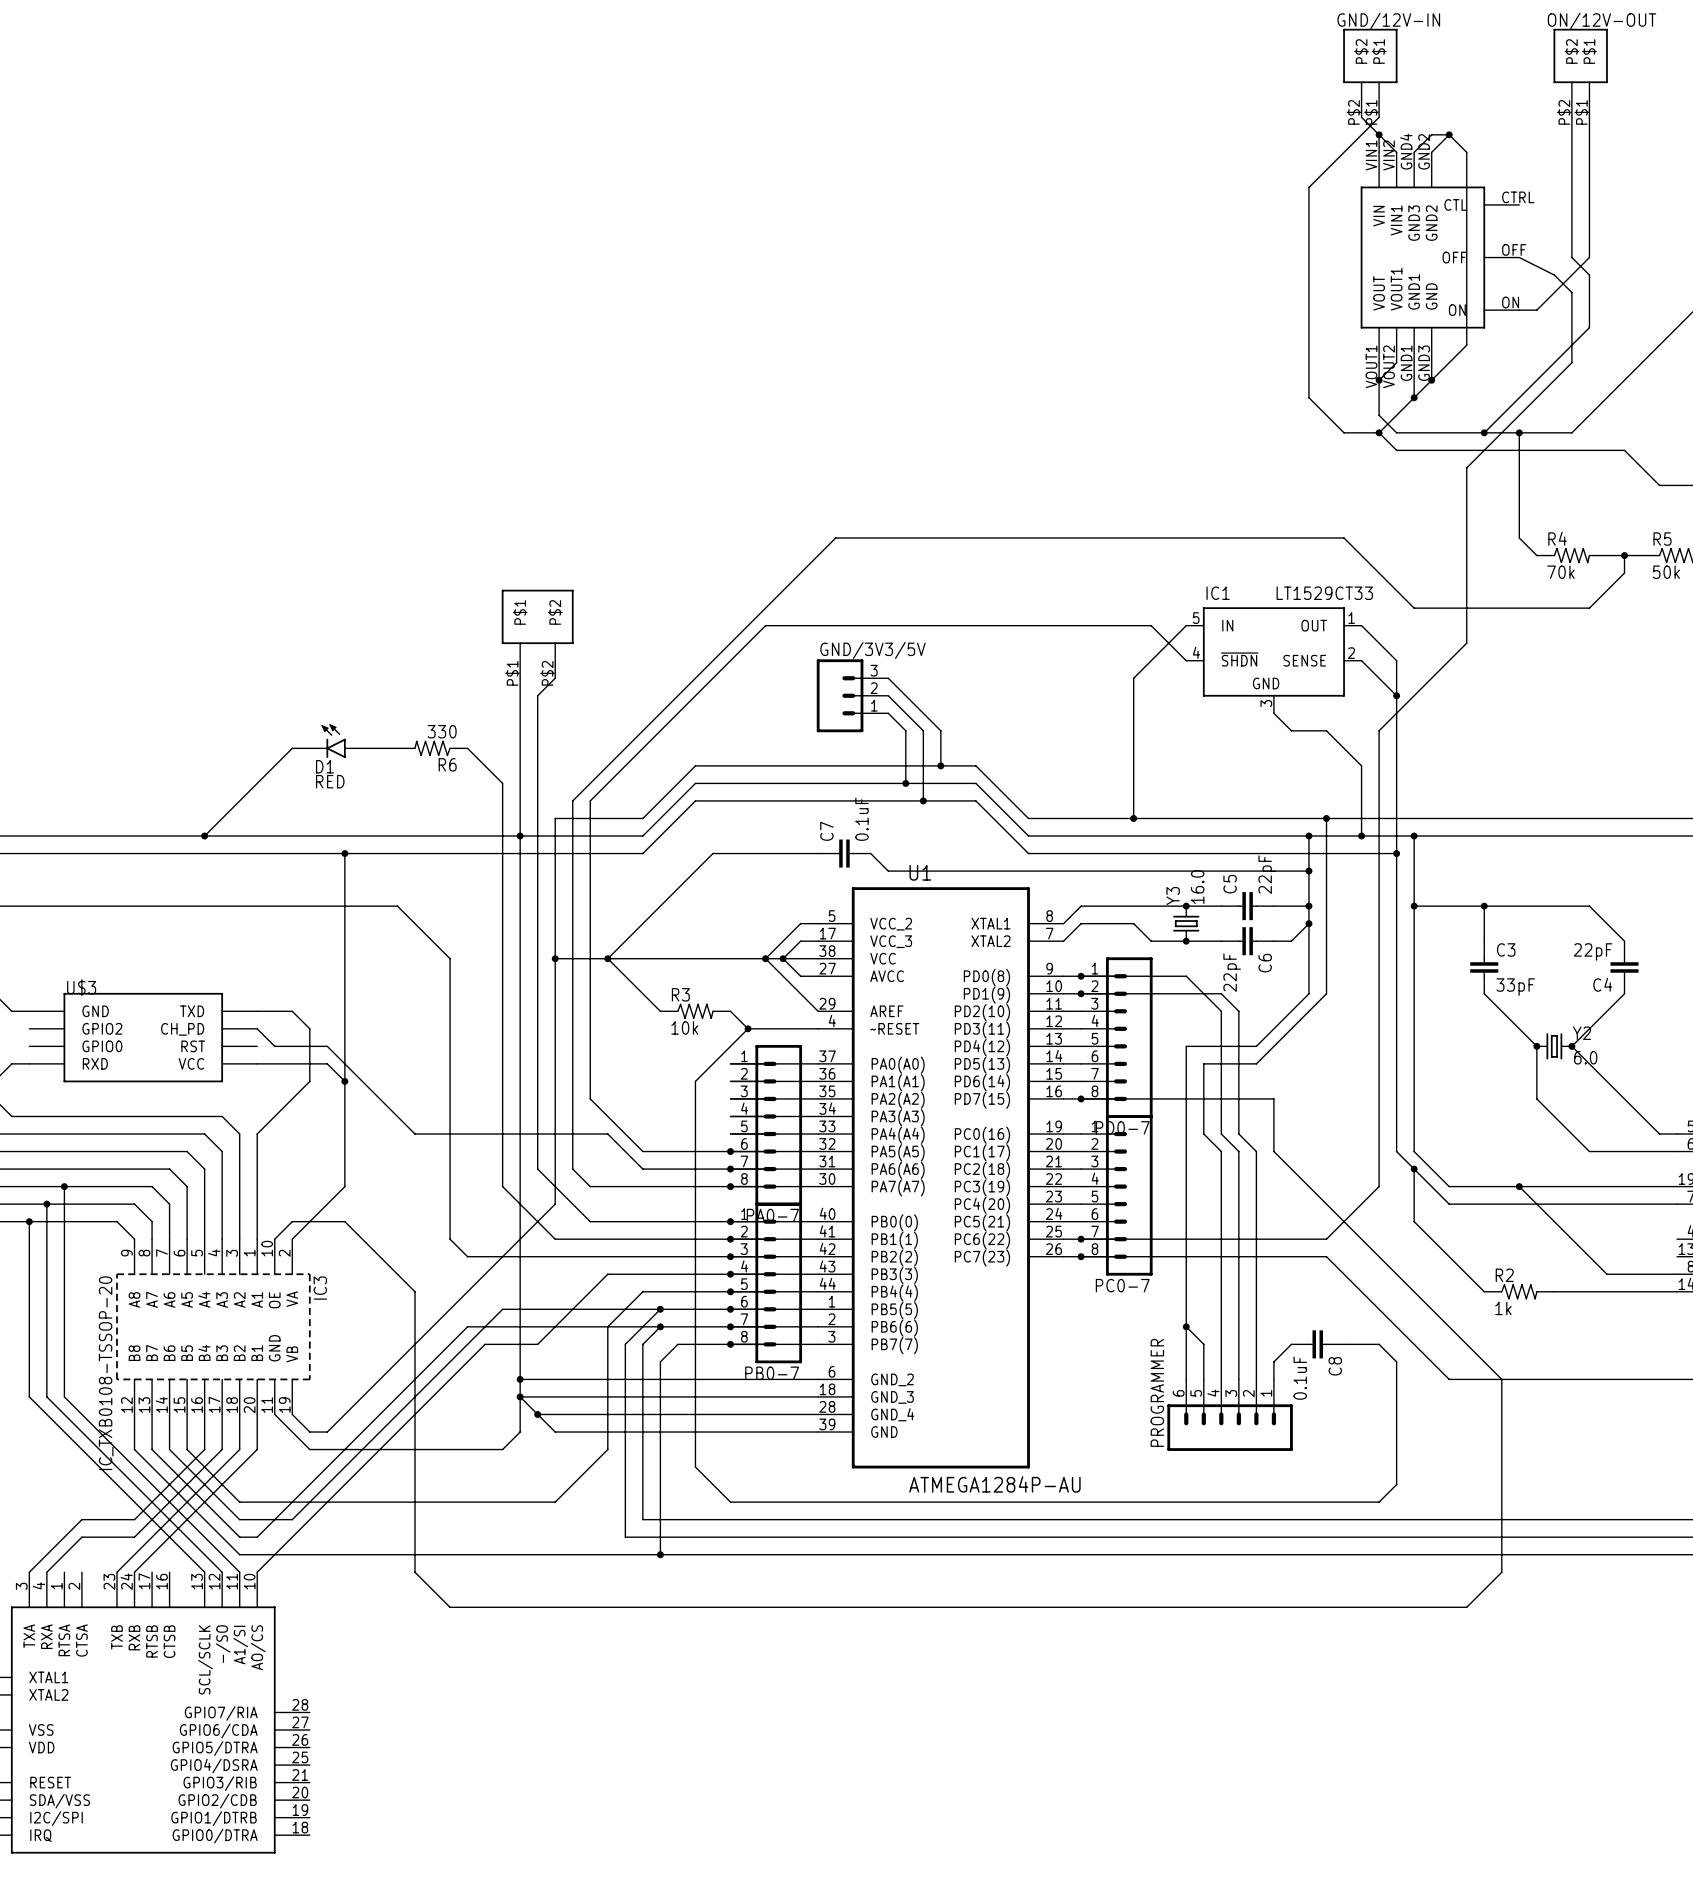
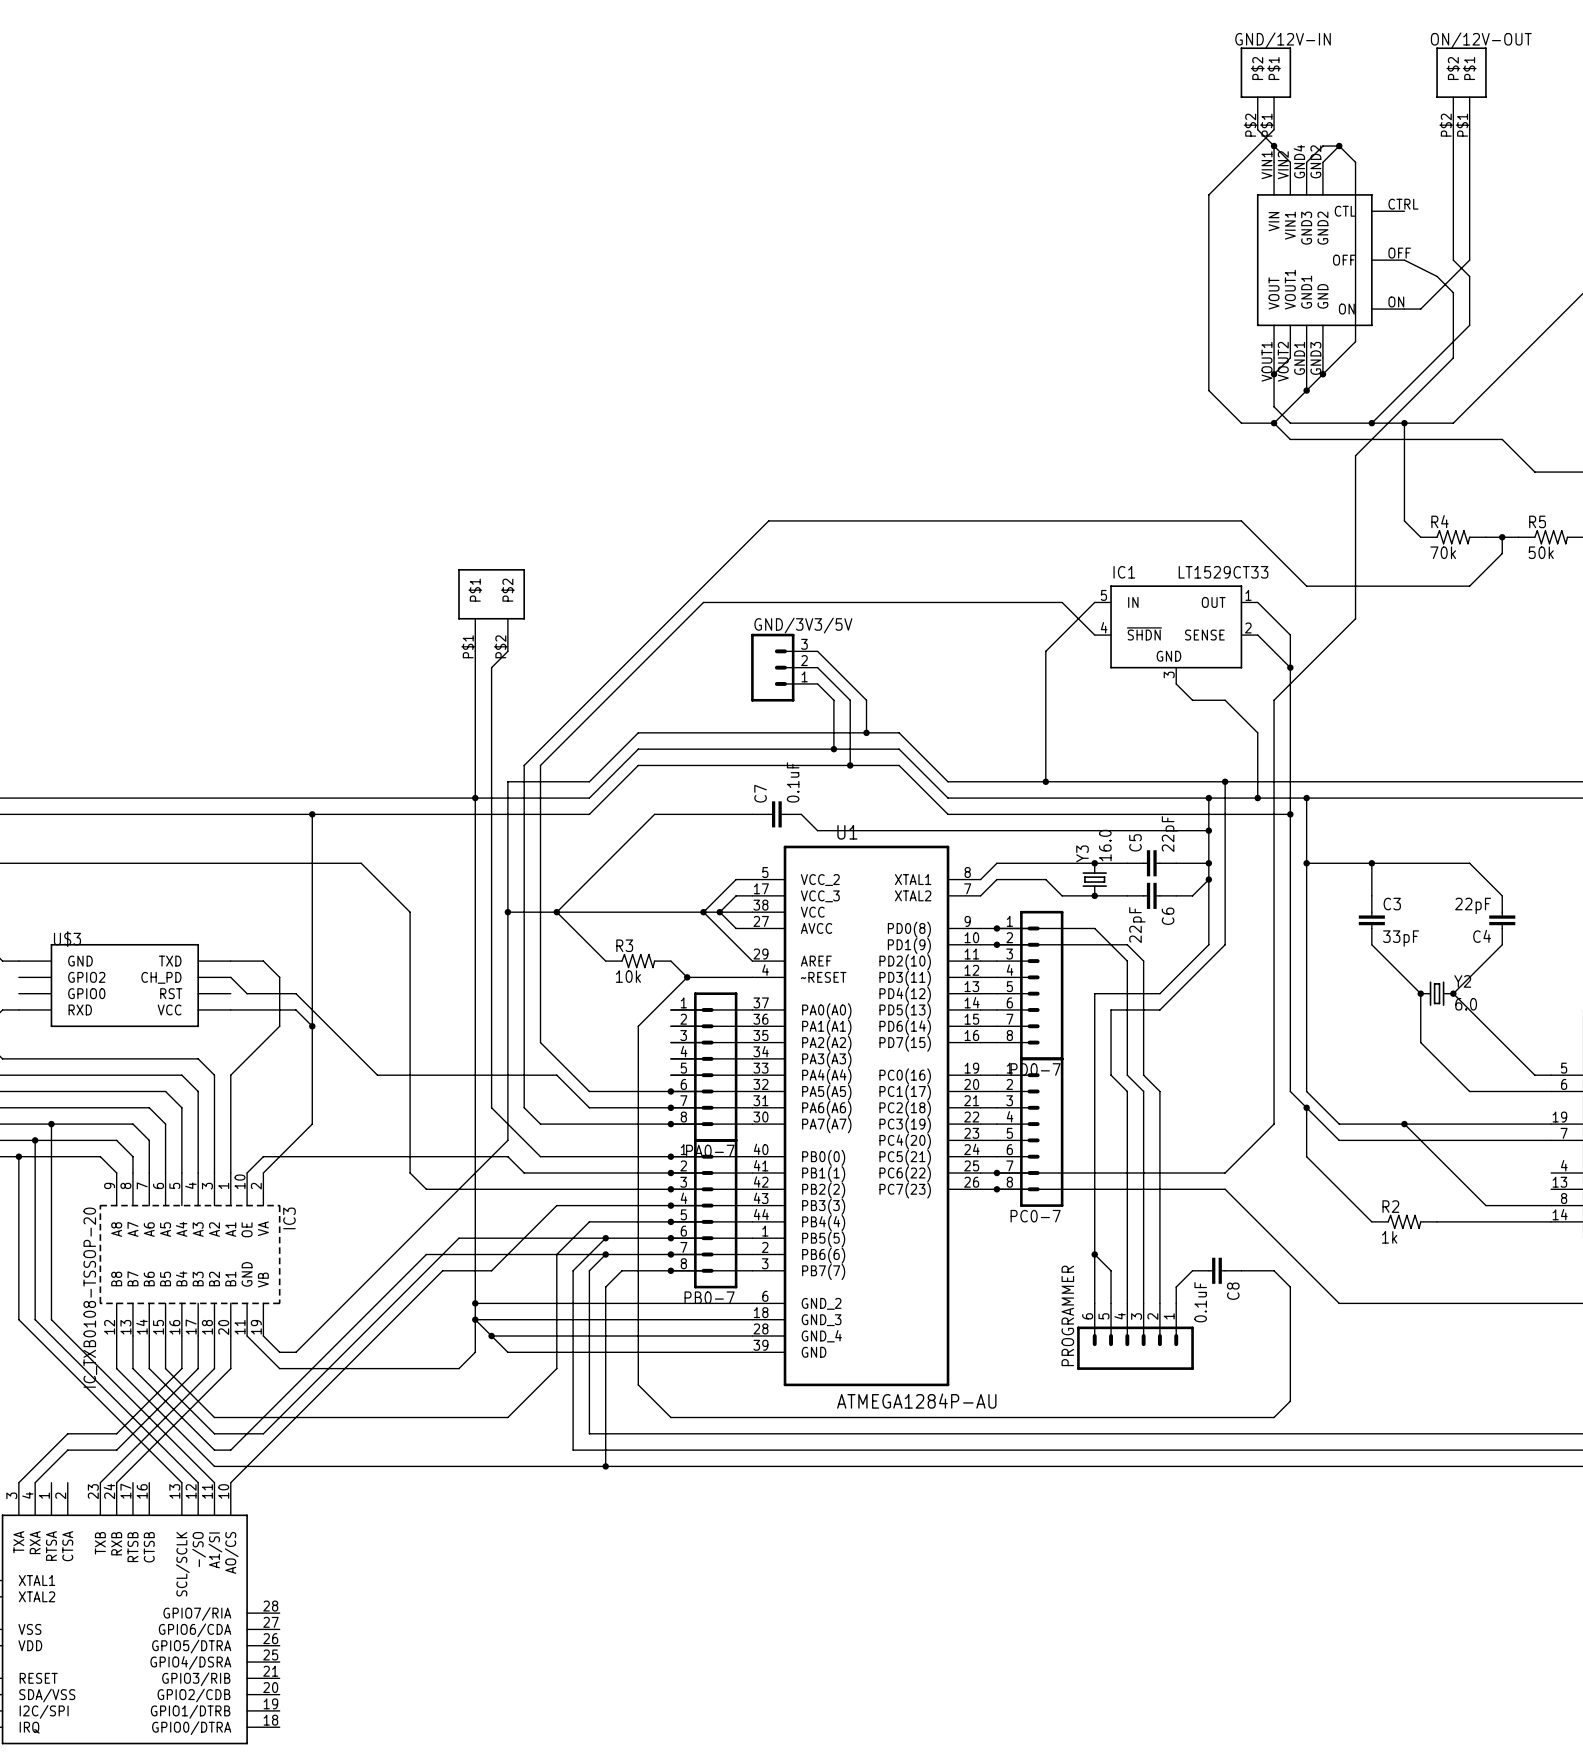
D1: RED (336, 741) -> none
wire: (309, 748) (292, 748) (204, 836) -> none
wire: (362, 748) (397, 748) -> none
R6: 330 (432, 748) -> none
wire: (467, 748) (502, 783) (502, 1186) (555, 1239) (572, 1239) -> (312, 1156) (507, 1156) (524, 1172)
junction: (204, 836) -> none
wire: (1081, 1098) (1273, 1098) (1273, 1151) (1501, 1379) (1501, 1572) (1466, 1607) (450, 1607) (414, 1572) (414, 1291) (344, 1221) -> none
junction: (1081, 1098) -> none

